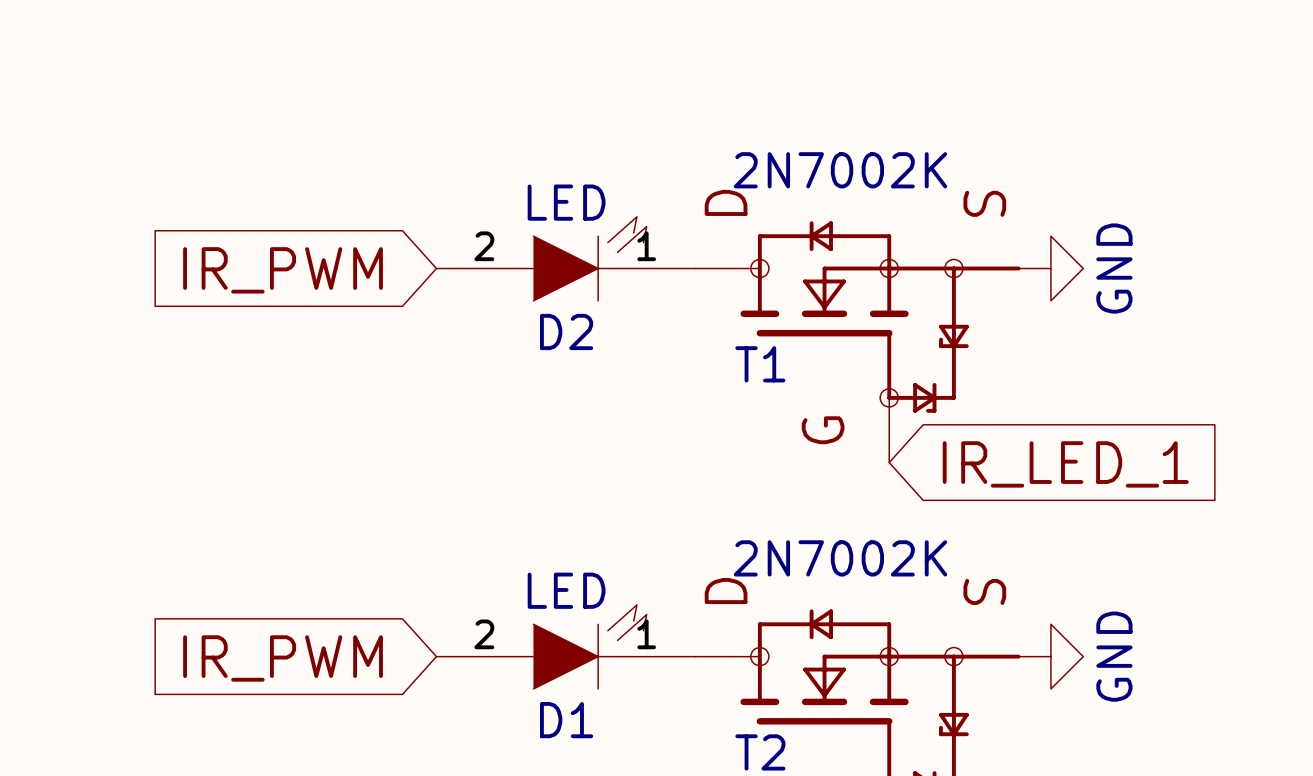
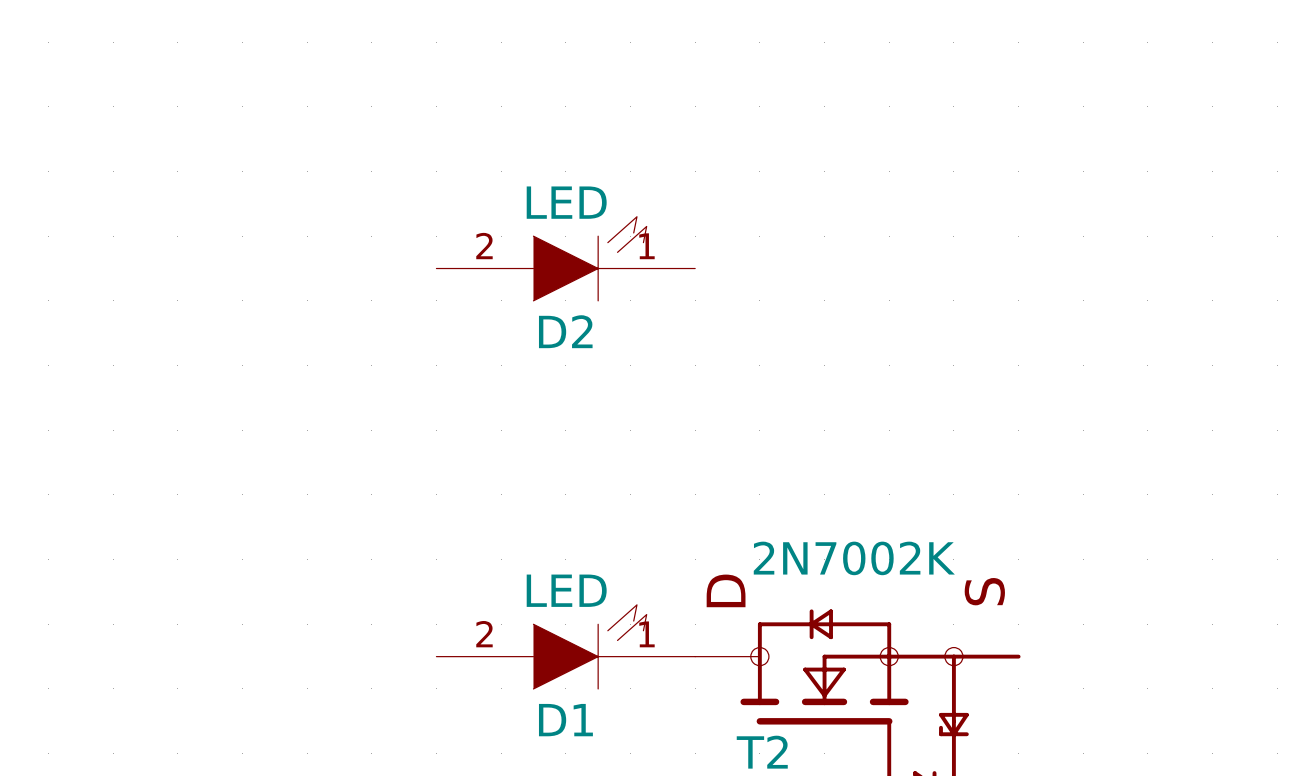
power symbol: GND (1050, 268) -> none
global label: IR_PWM (283, 270) -> none
T1: 2N7002K (857, 341) -> none
global label: IR_LED_1 (1065, 464) -> none
power symbol: GND (1050, 656) -> none
global label: IR_PWM (283, 658) -> none

